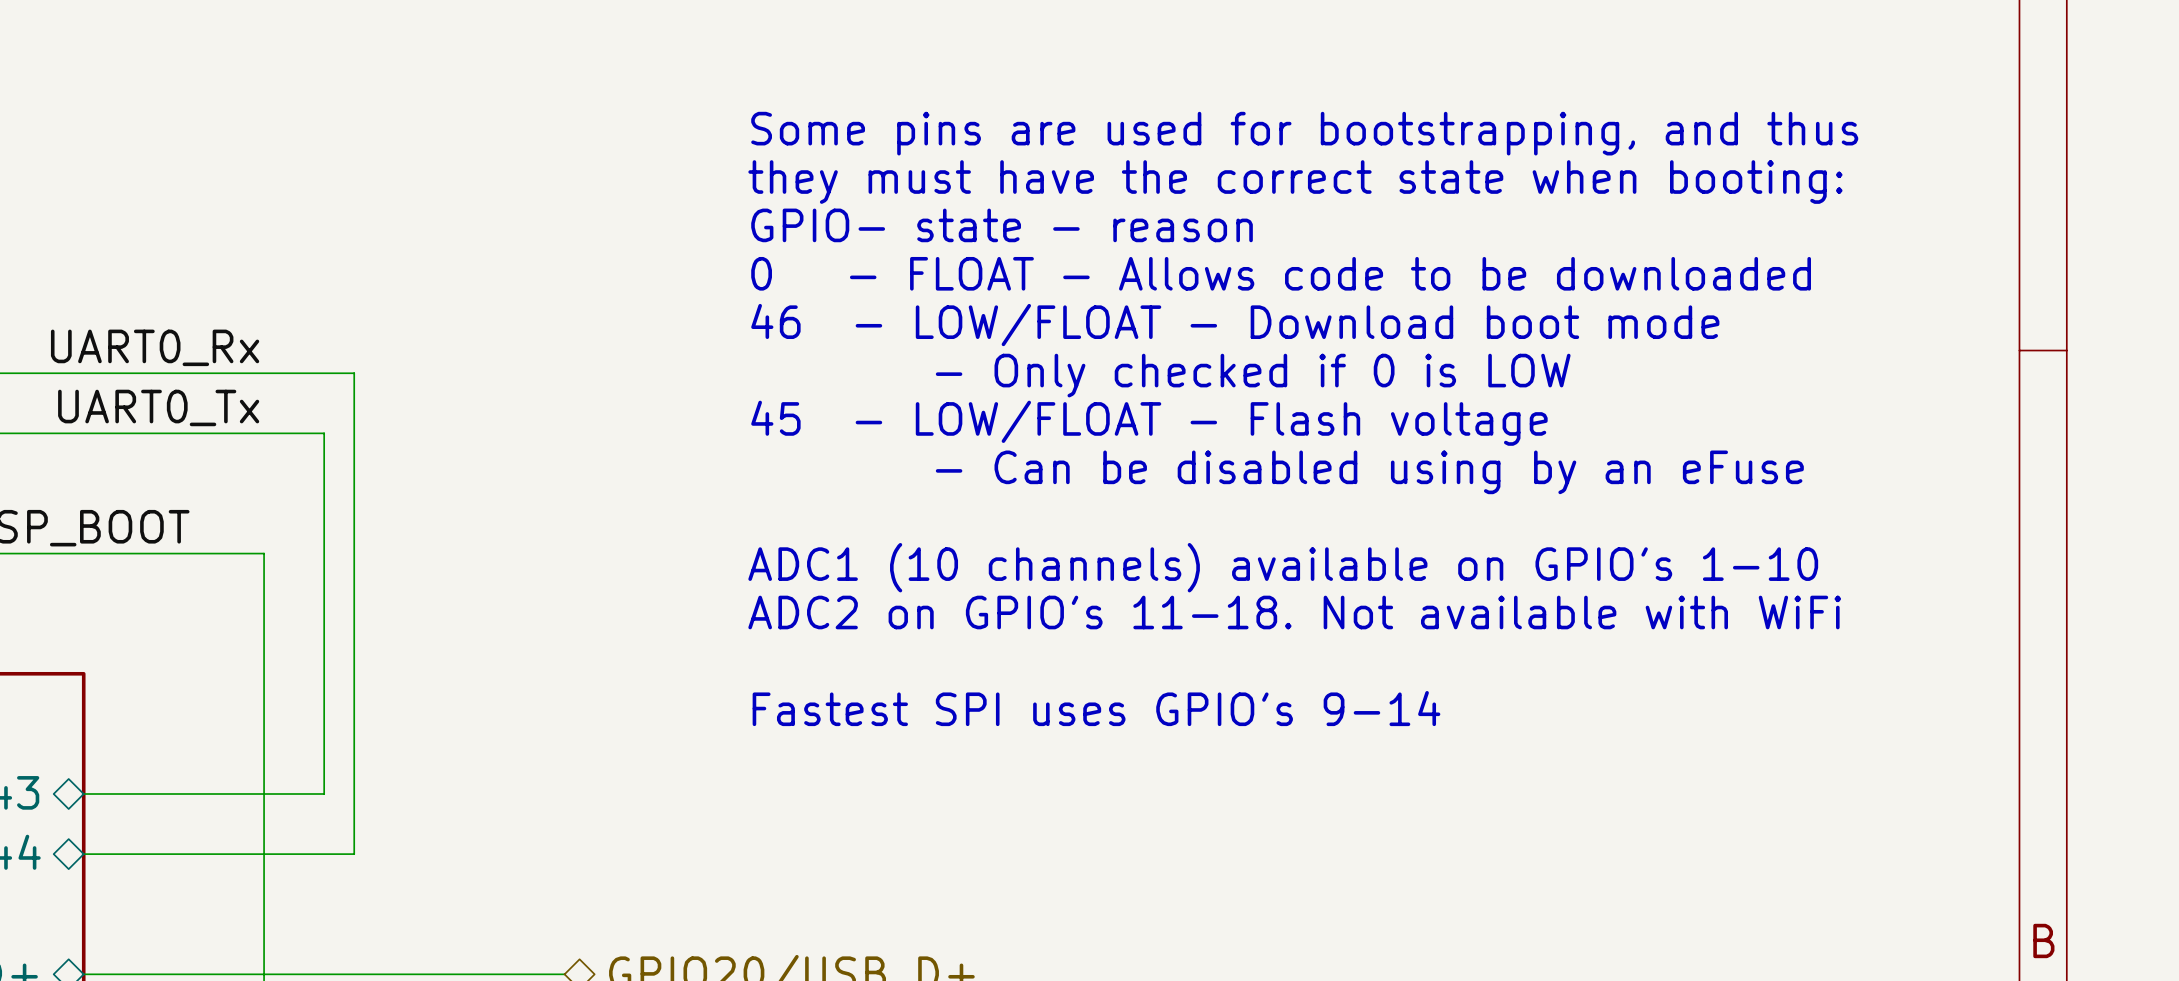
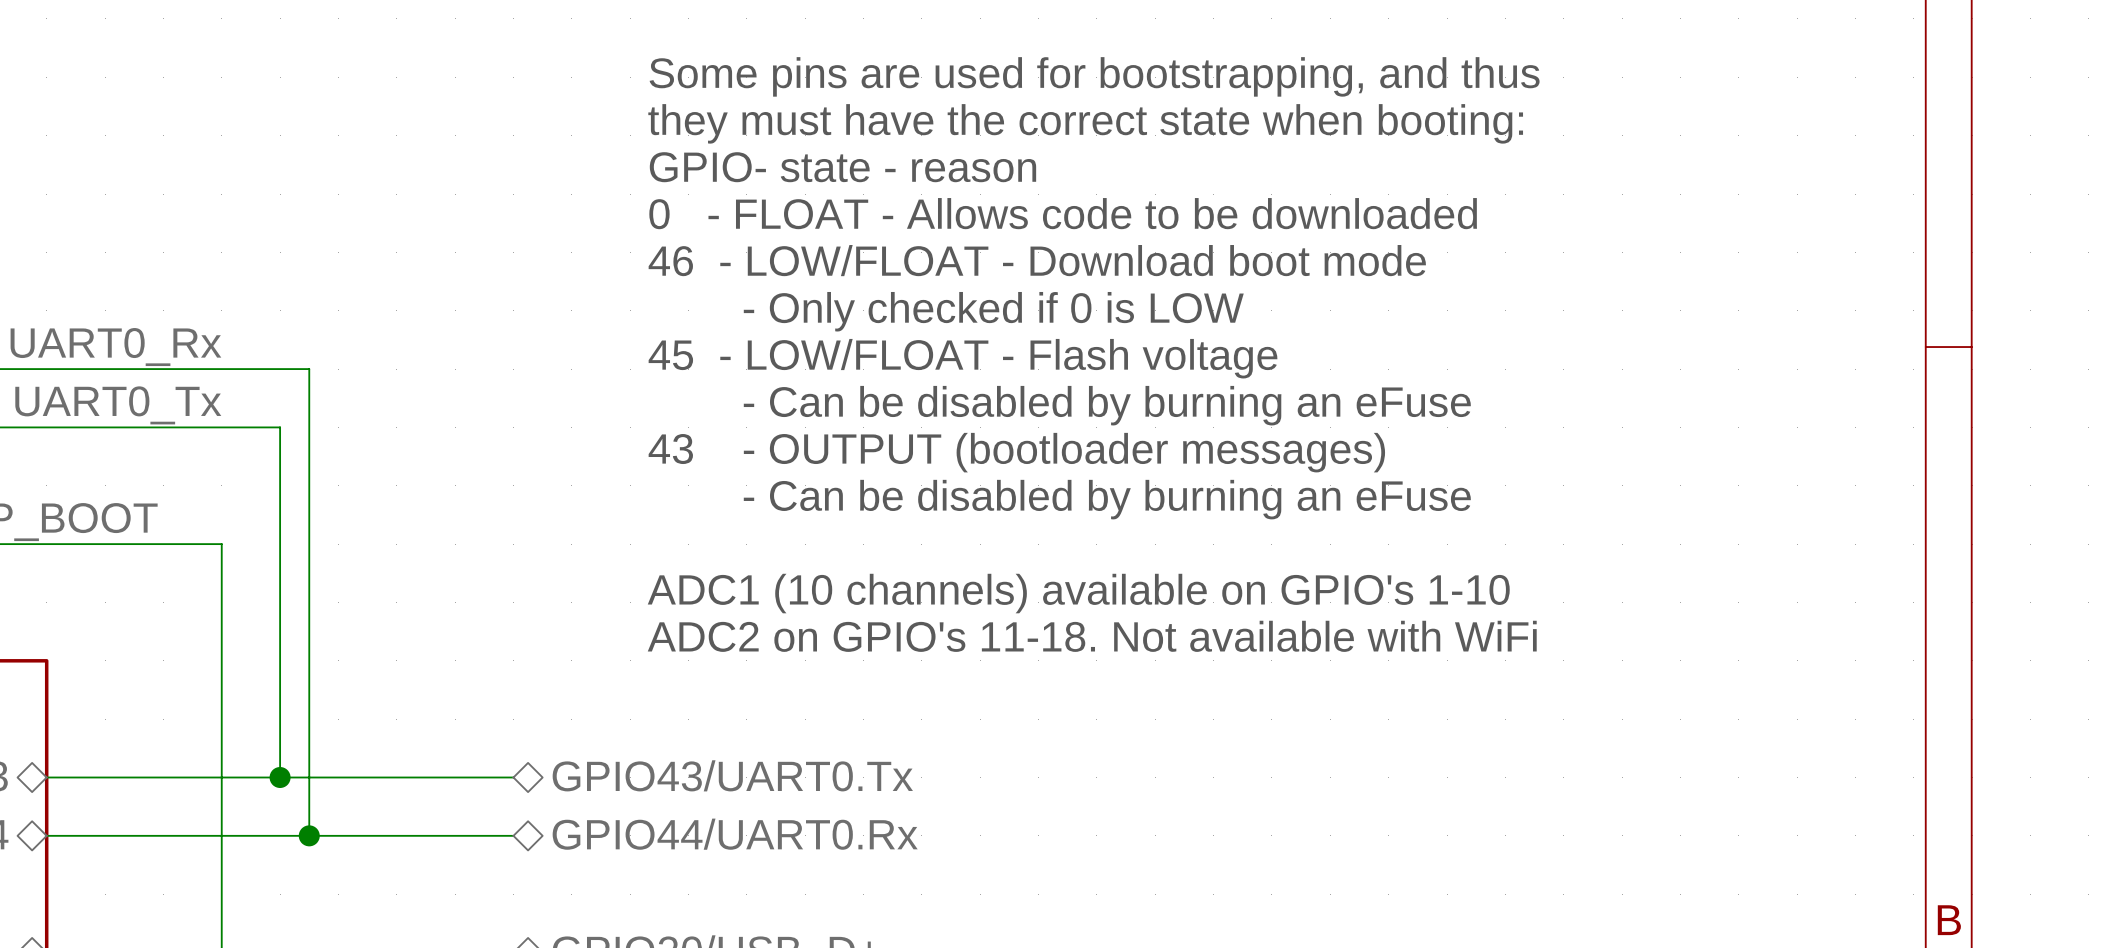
text position: Some pins are used for bootstrapping, and thus (1304, 133) -> Some pins are used for bootstrapping, and thus (1094, 76)
text position: they must have the correct state when booting: (1295, 182) -> they must have the correct state when booting: (1085, 123)
text position: GPIO- state - reason (1002, 225) -> GPIO- state - reason (842, 167)
text position: 0 - FLOAT - Allows code to be downloaded (1281, 273) -> 0 - FLOAT - Allows code to be downloaded (1063, 213)
text position: 46 - LOW/FLOAT - Download boot mode (1235, 325) -> 46 - LOW/FLOAT - Download boot mode (1037, 260)
text position: - Only checked if 0 is LOW (1253, 375) -> - Only checked if 0 is LOW (993, 311)
text: none -> - Can be disabled by burning an eFuse (1107, 405)
text position: 45 - LOW/FLOAT - Flash voltage (1149, 423) -> 45 - LOW/FLOAT - Flash voltage (963, 358)
text: none -> 43 - OUTPUT (bootloader messages) (1016, 452)
text: - Can be disabled using by an eFuse (1369, 472) -> none
text: none -> - Can be disabled by burning an eFuse (1107, 499)
text position: ADC1 (10 channels) available on GPIO's 1-10 (1283, 567) -> ADC1 (10 channels) available on GPIO's 1-10 (1078, 593)
text position: ADC2 on GPIO's 11-18. Not available with WiFi (1294, 612) -> ADC2 on GPIO's 11-18. Not available with WiFi (1092, 636)
text: Fastest SPI uses GPIO's 9-14 (1096, 708) -> none
wire: none -> (280, 777) (513, 777)
junction: none -> (280, 777)
hierarchical label: none -> GPIO43/UART0.Tx (732, 775)
wire: none -> (309, 835) (513, 835)
junction: none -> (309, 835)
hierarchical label: none -> GPIO44/UART0.Rx (735, 834)

